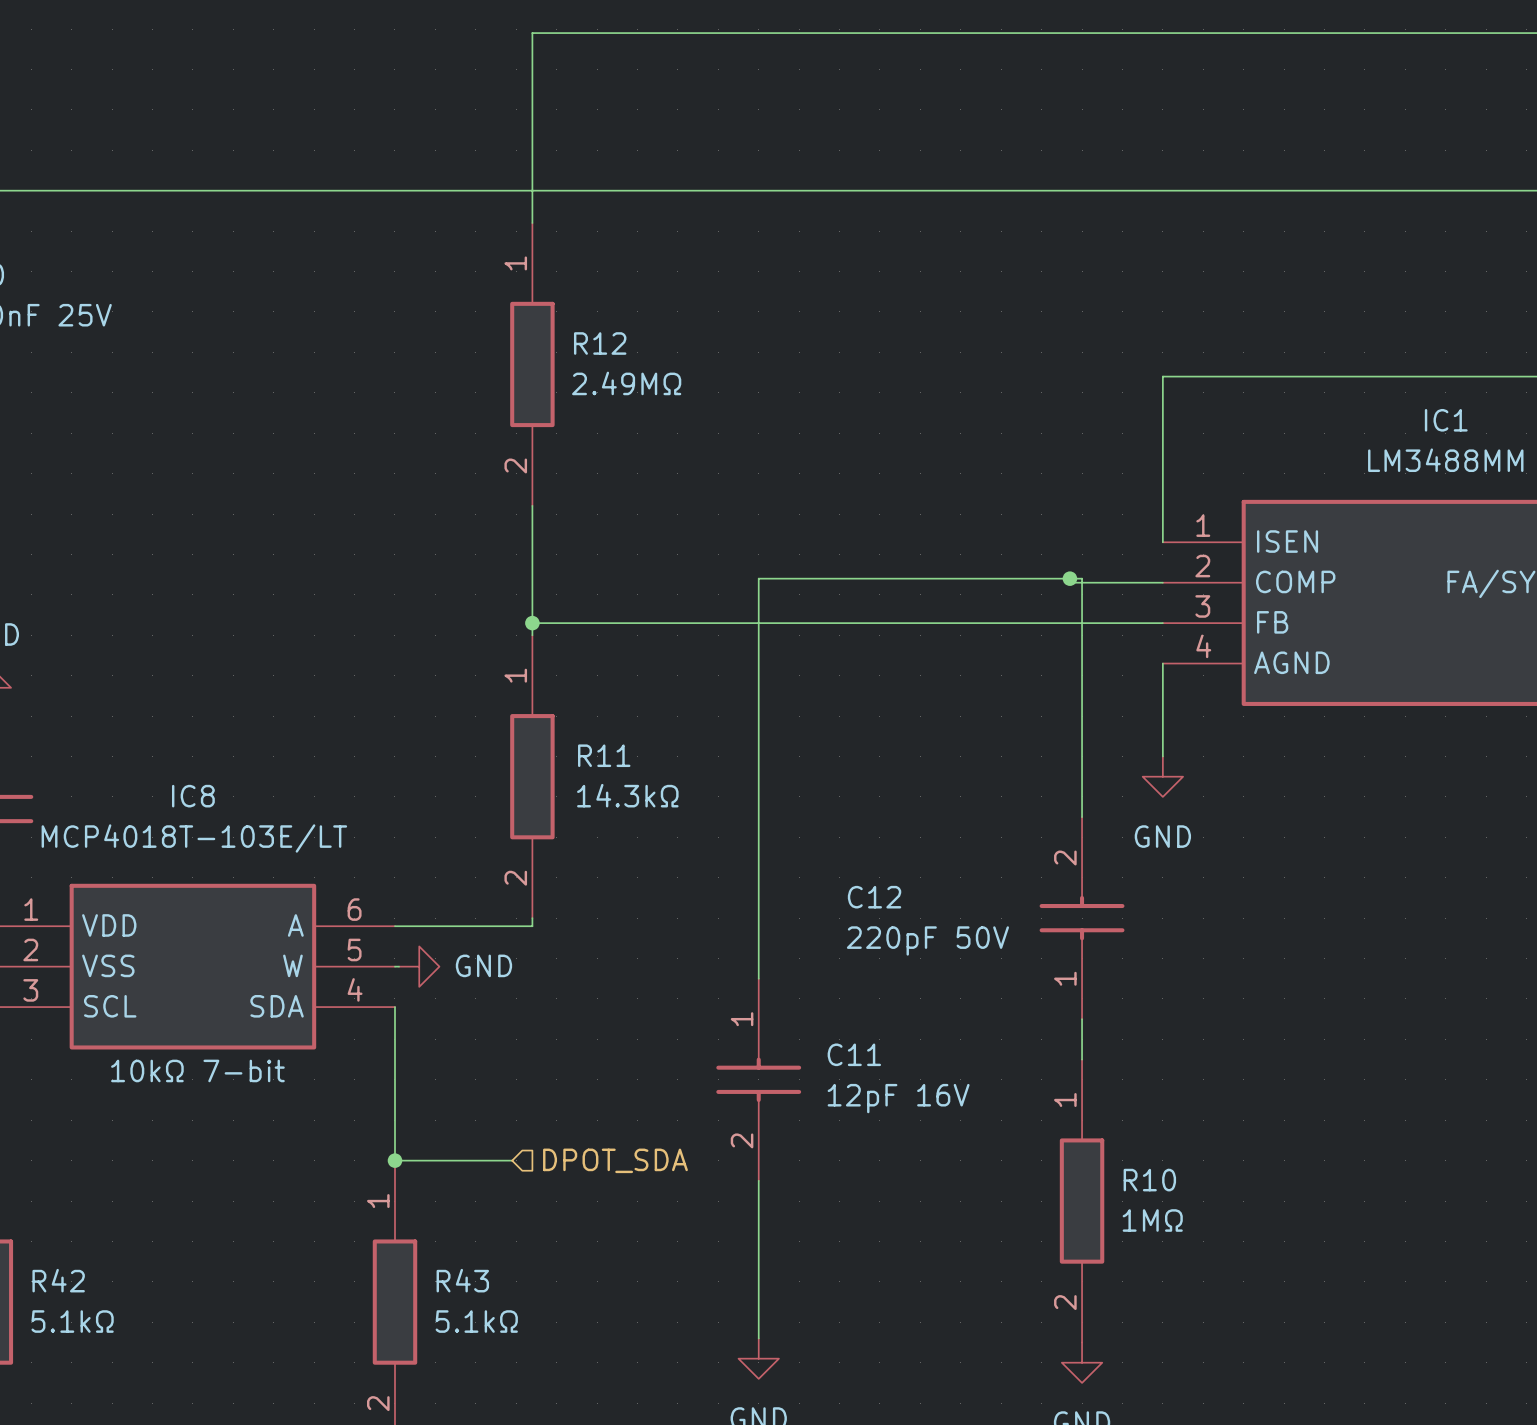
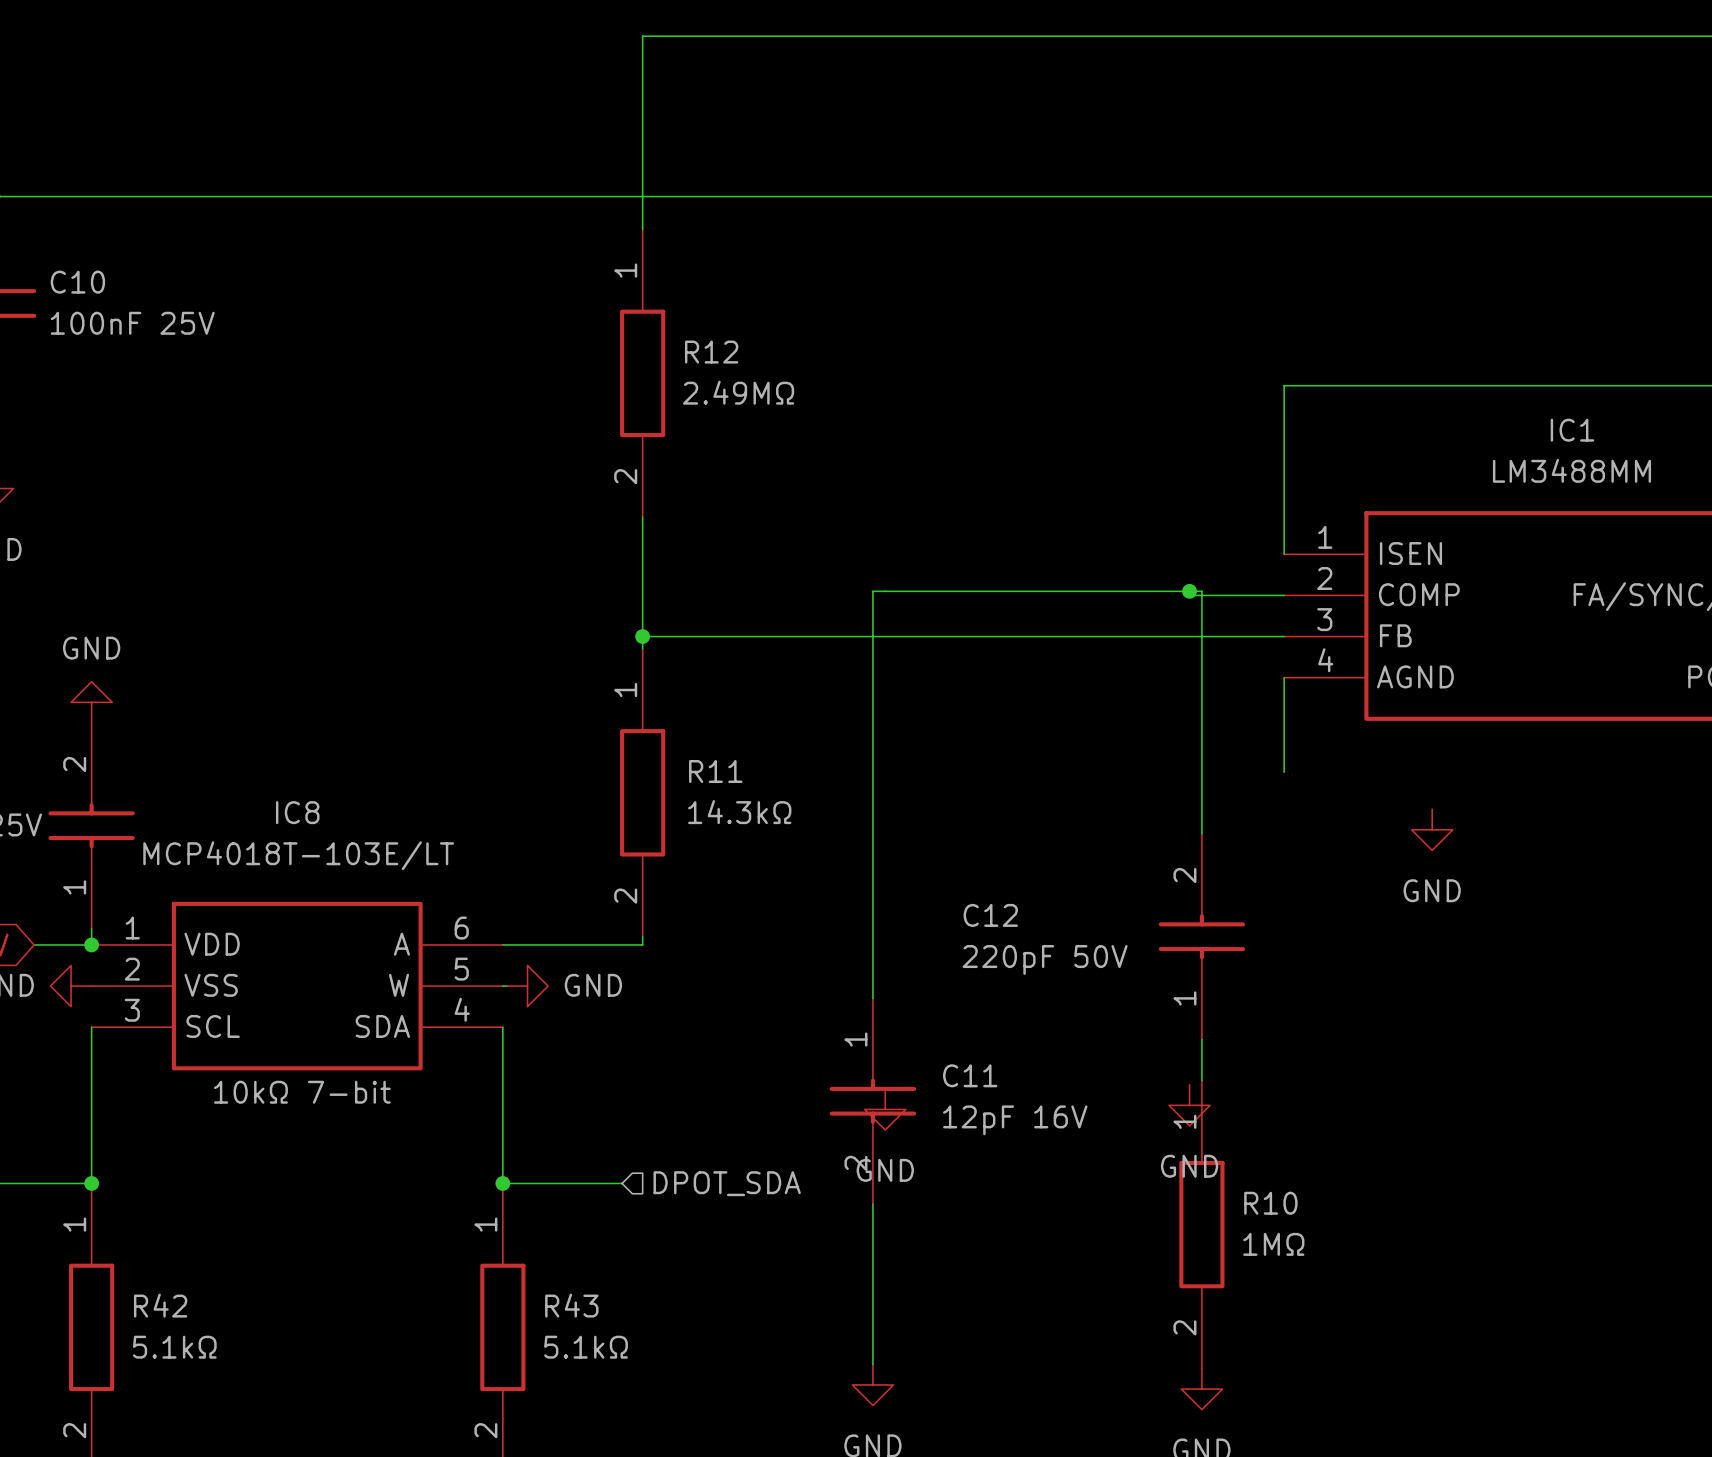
power symbol position: GND (1162, 776) -> GND (1432, 829)
power symbol: none -> GND (1189, 1105)
power symbol: none -> GND (885, 1109)

